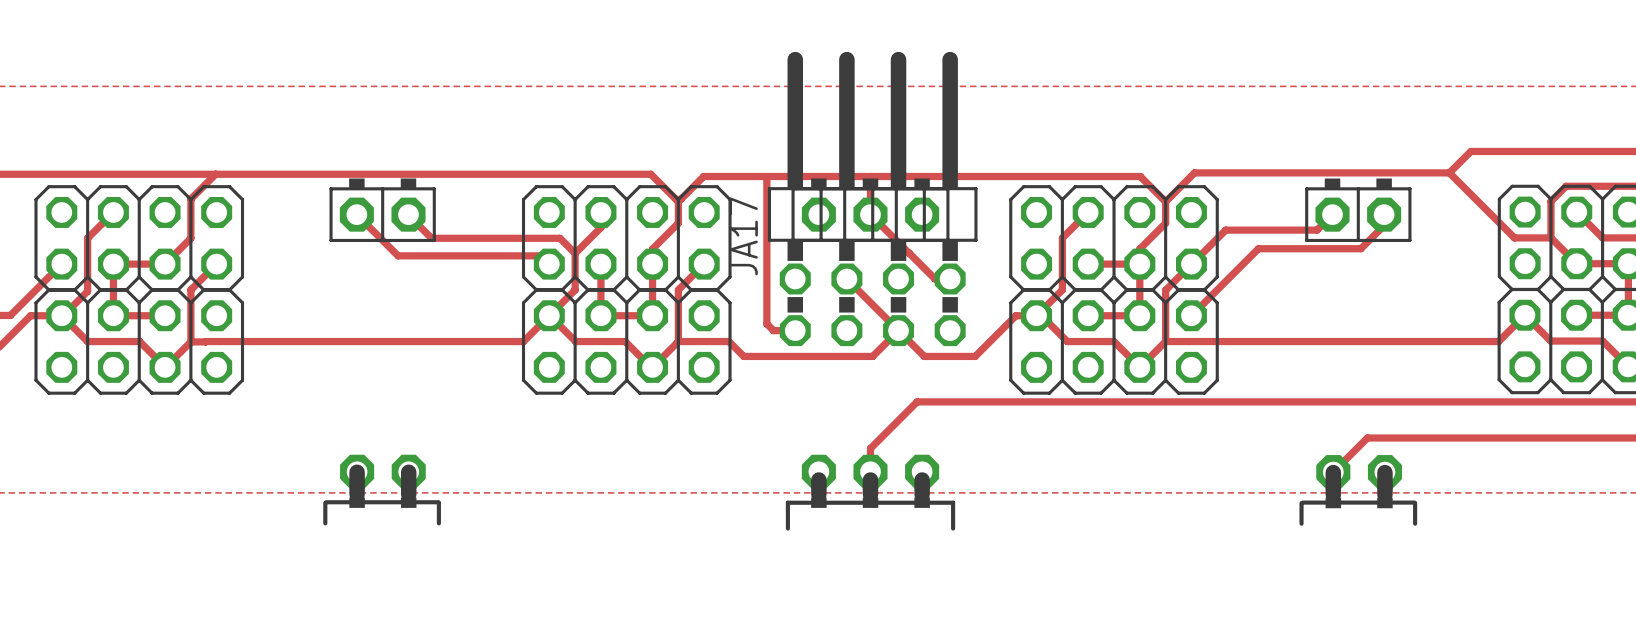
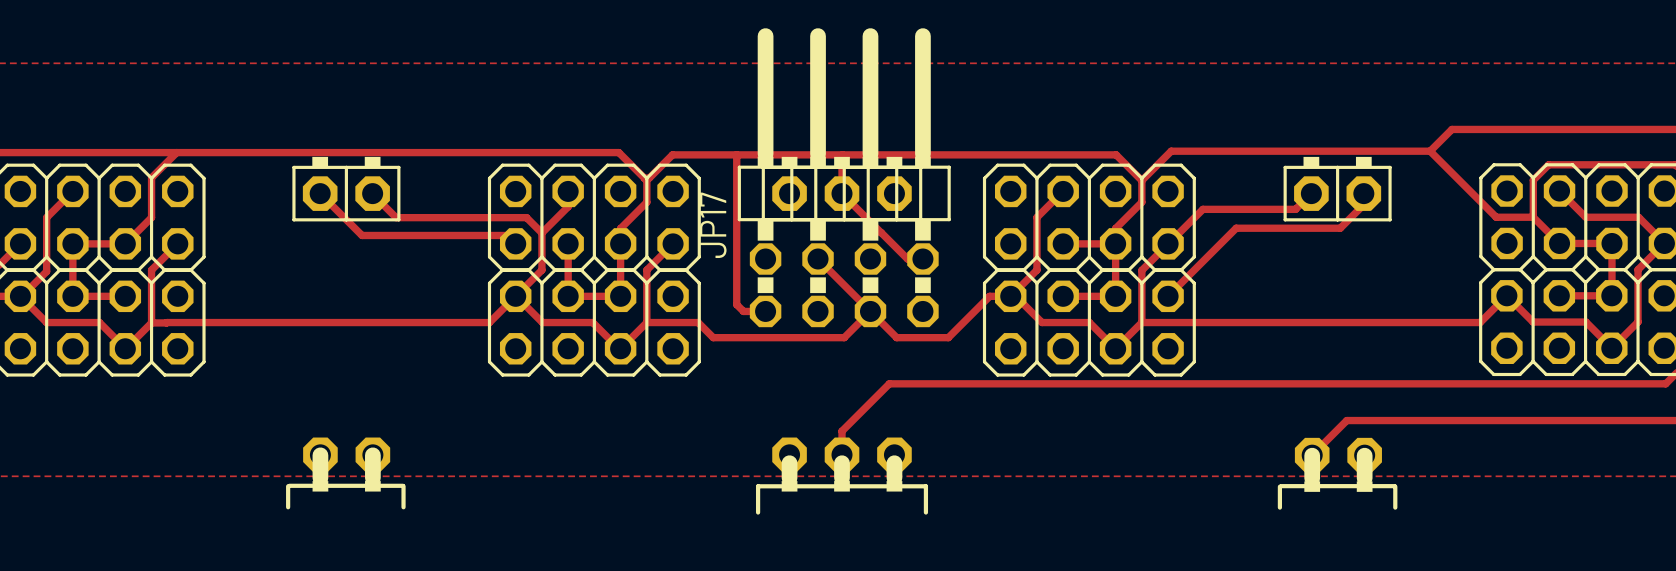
JA17 name: JA17 (743, 236) -> JP17 (713, 225)

